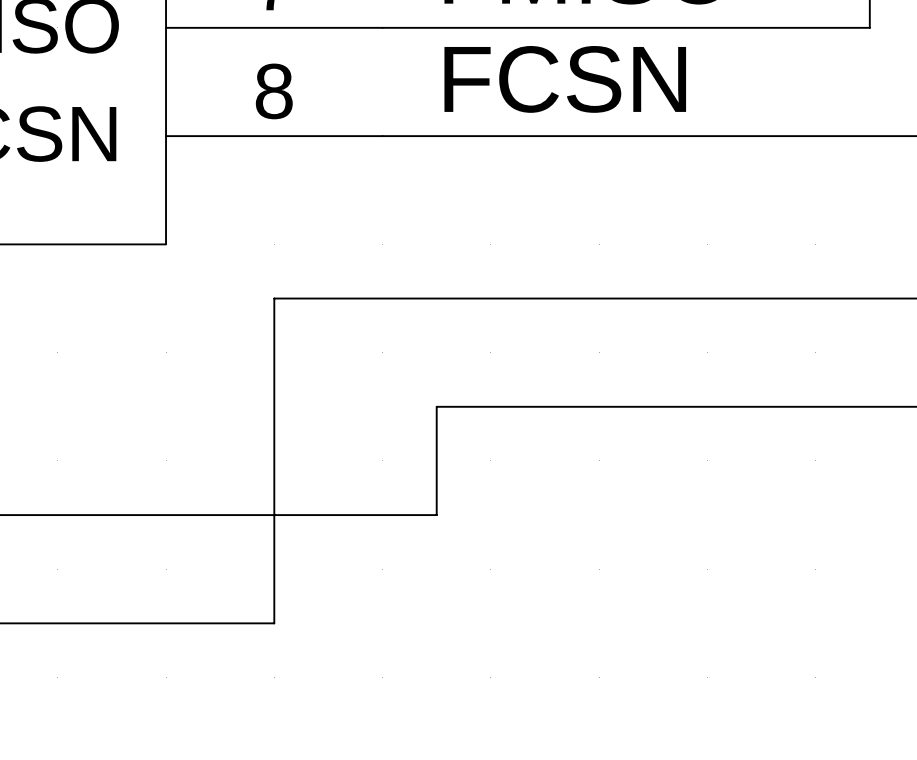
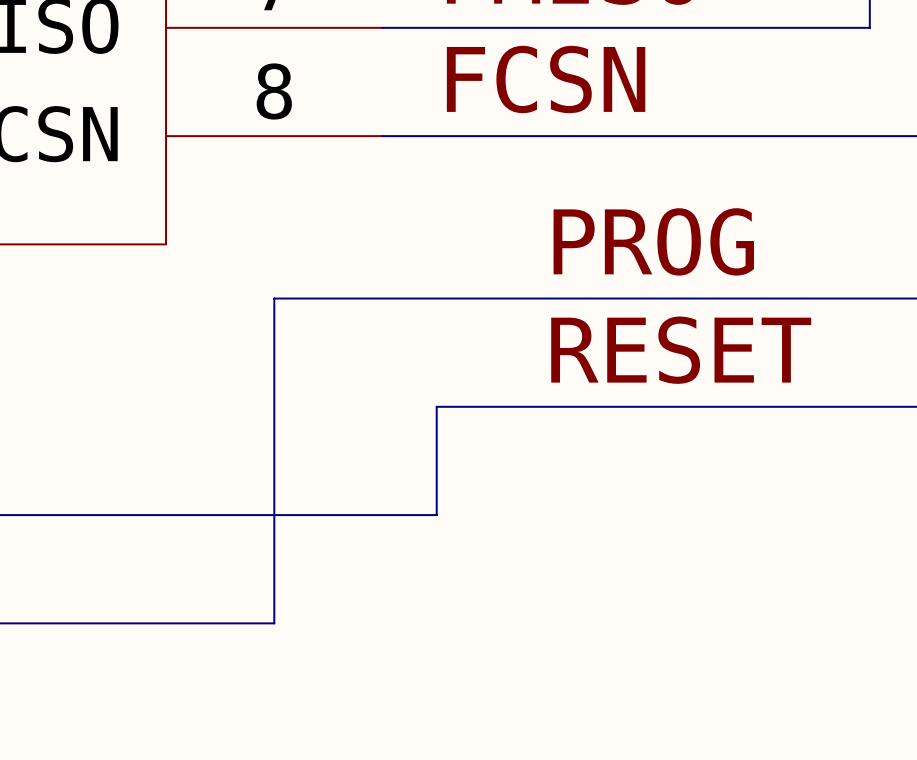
label: none -> PROG (653, 241)
label: none -> RESET (681, 350)

